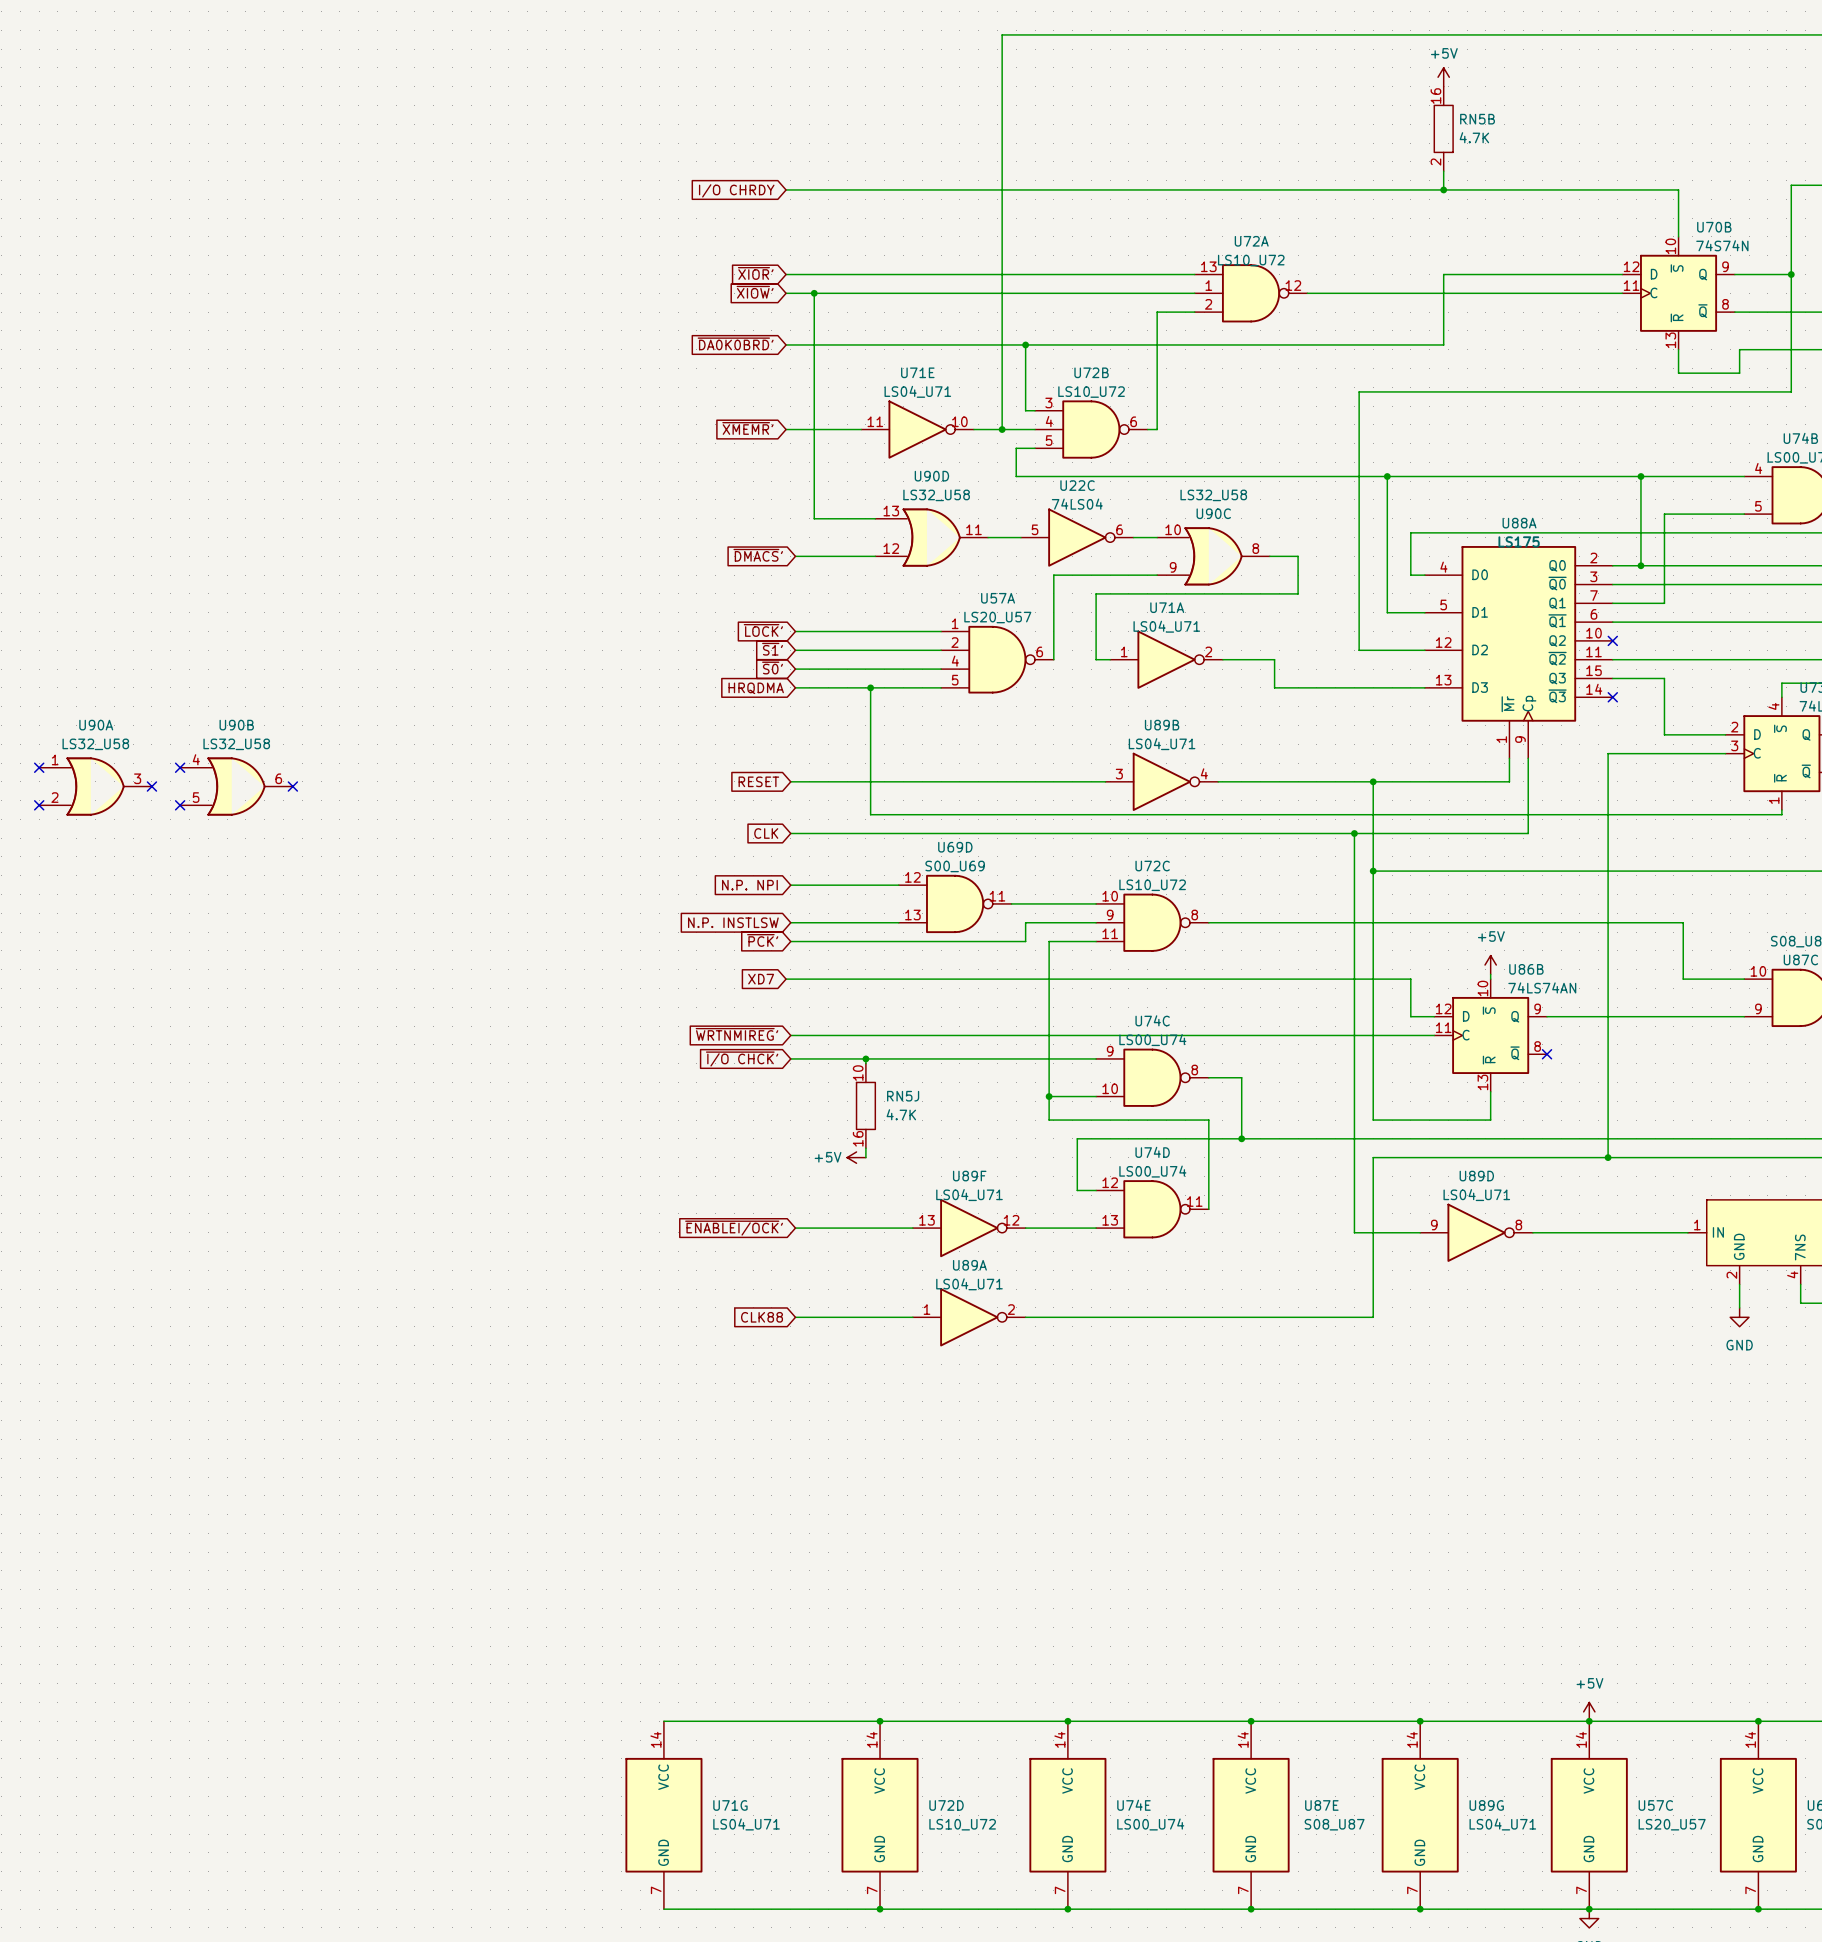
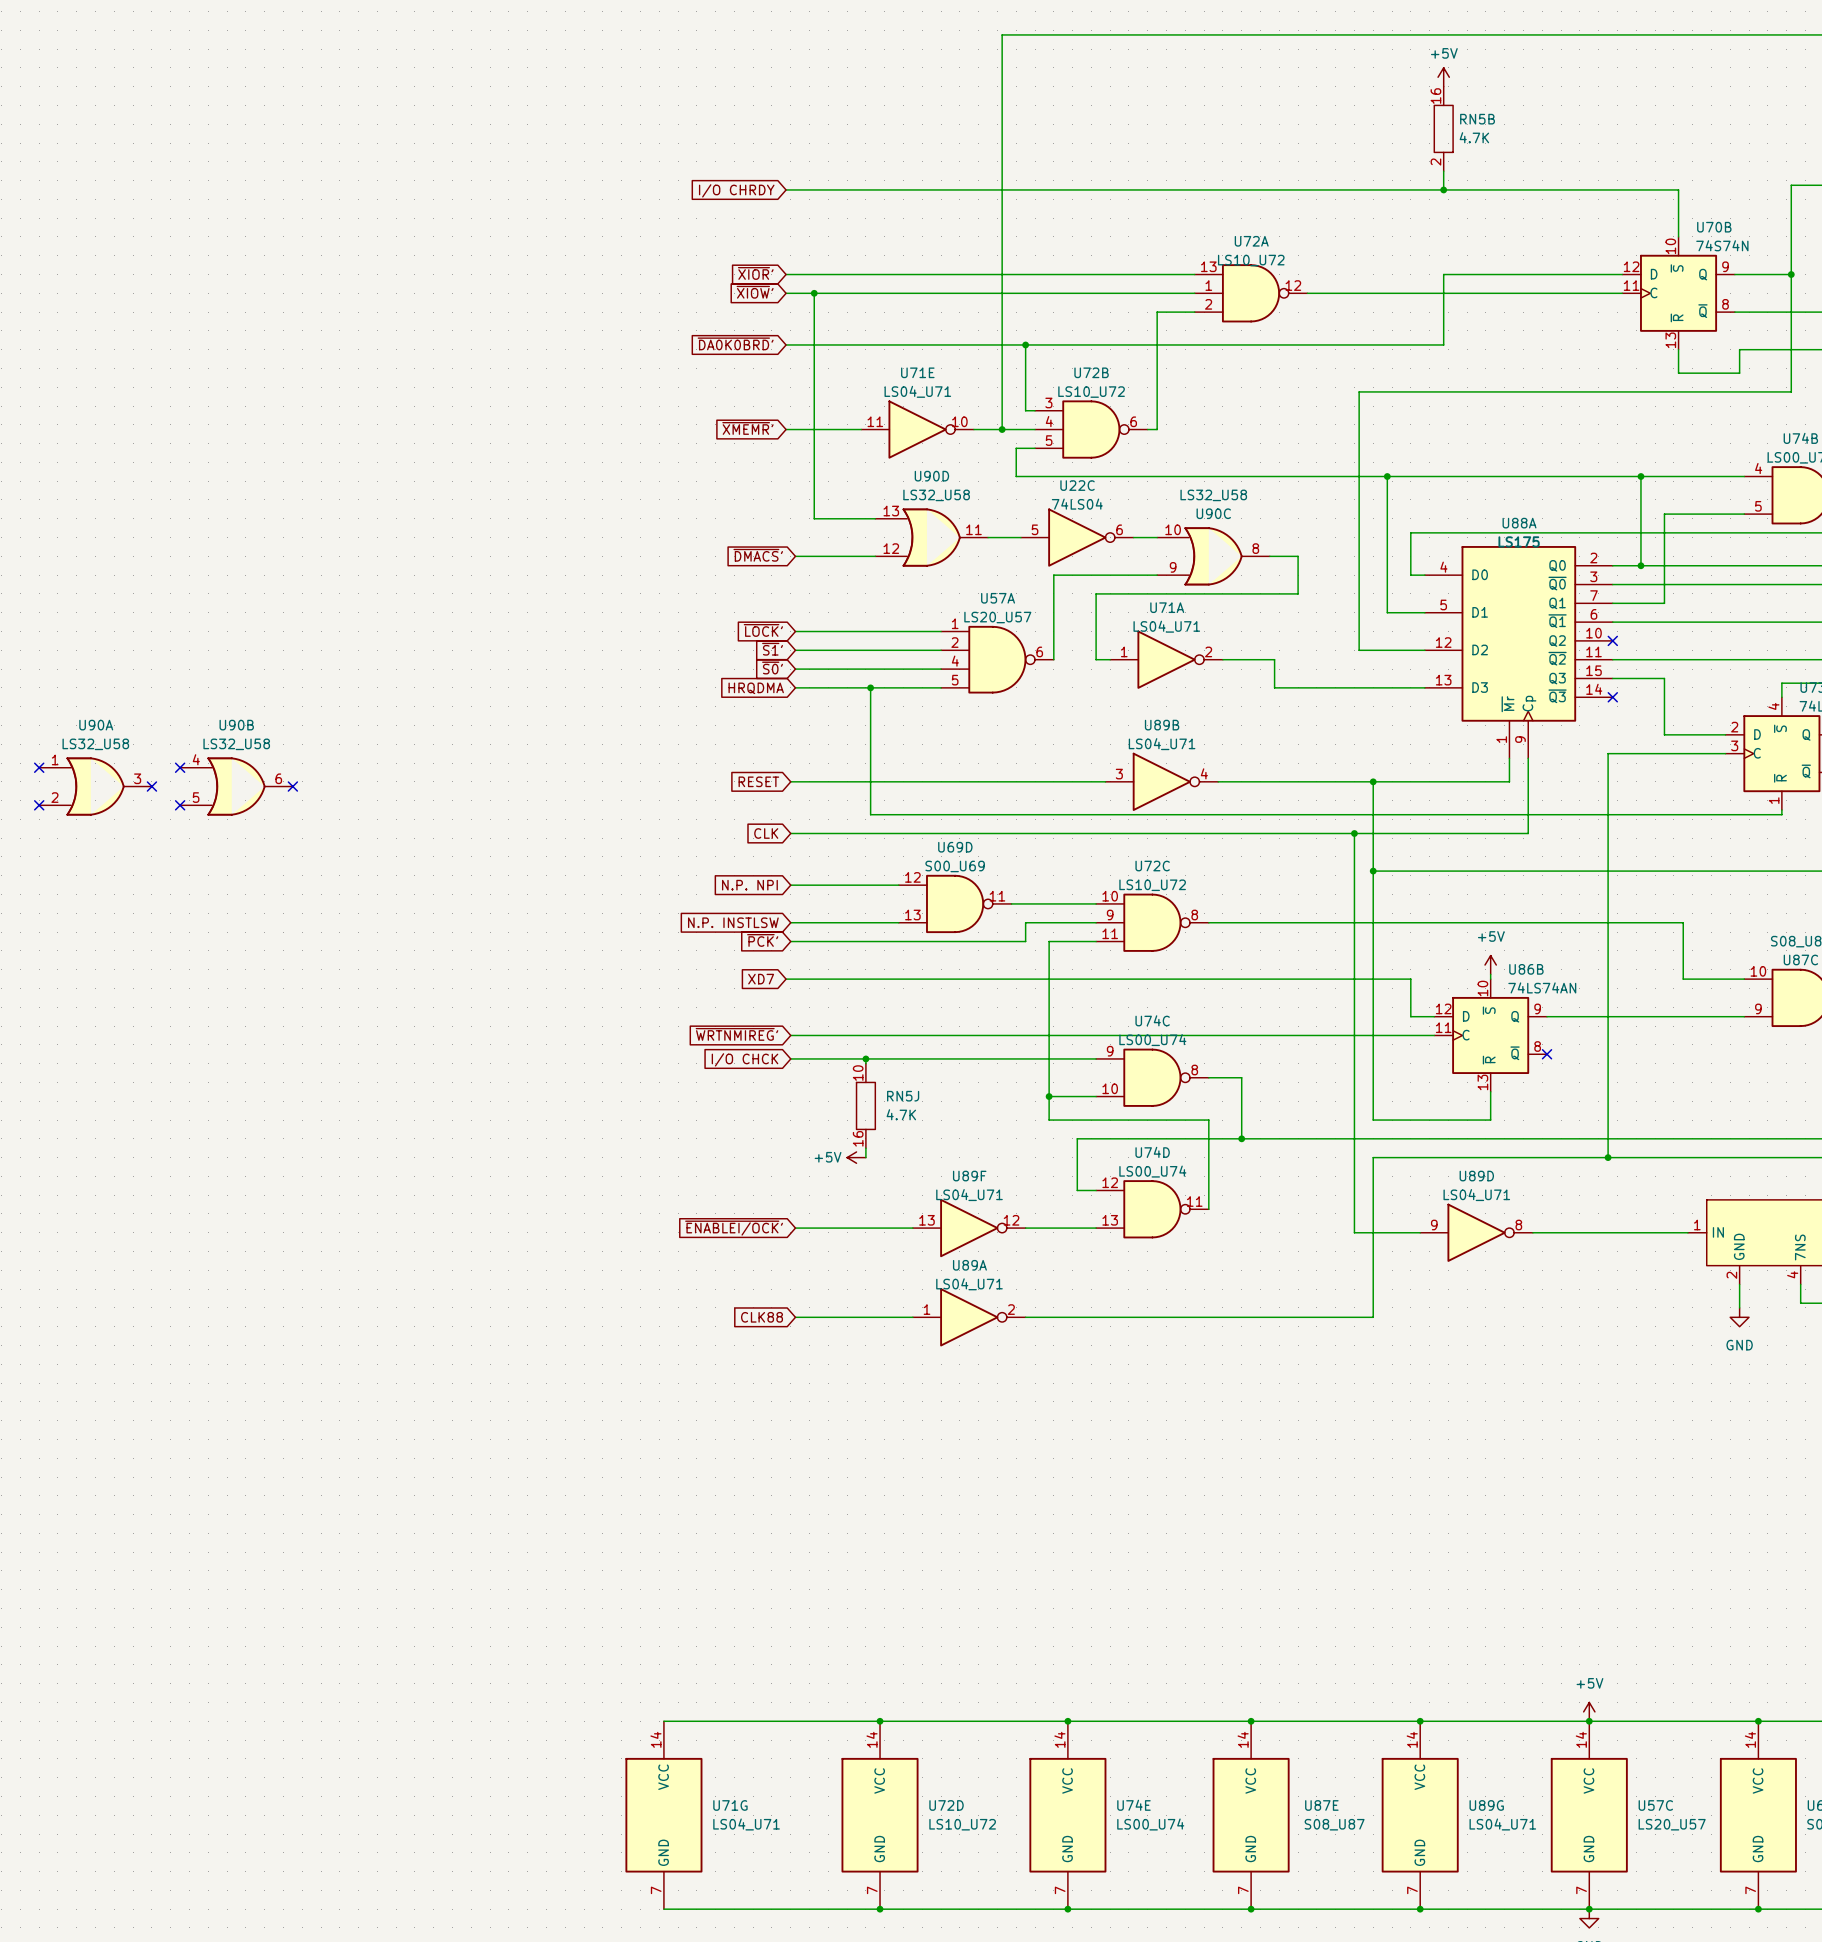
global label: ~{I/O CHCK}' (742, 1059) -> I/O CHCK (745, 1059)

